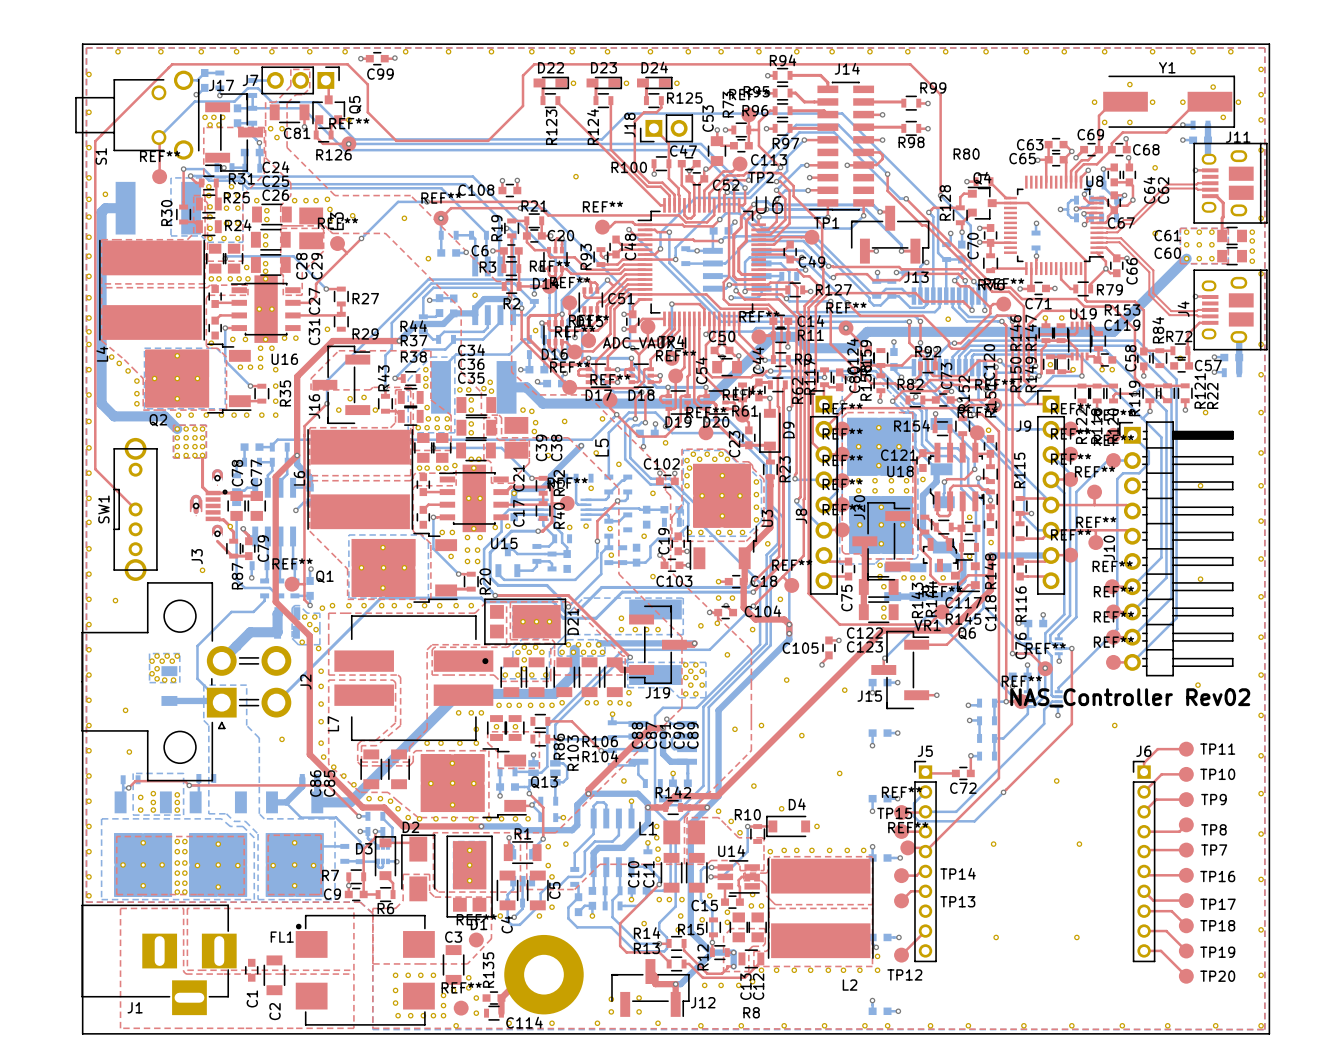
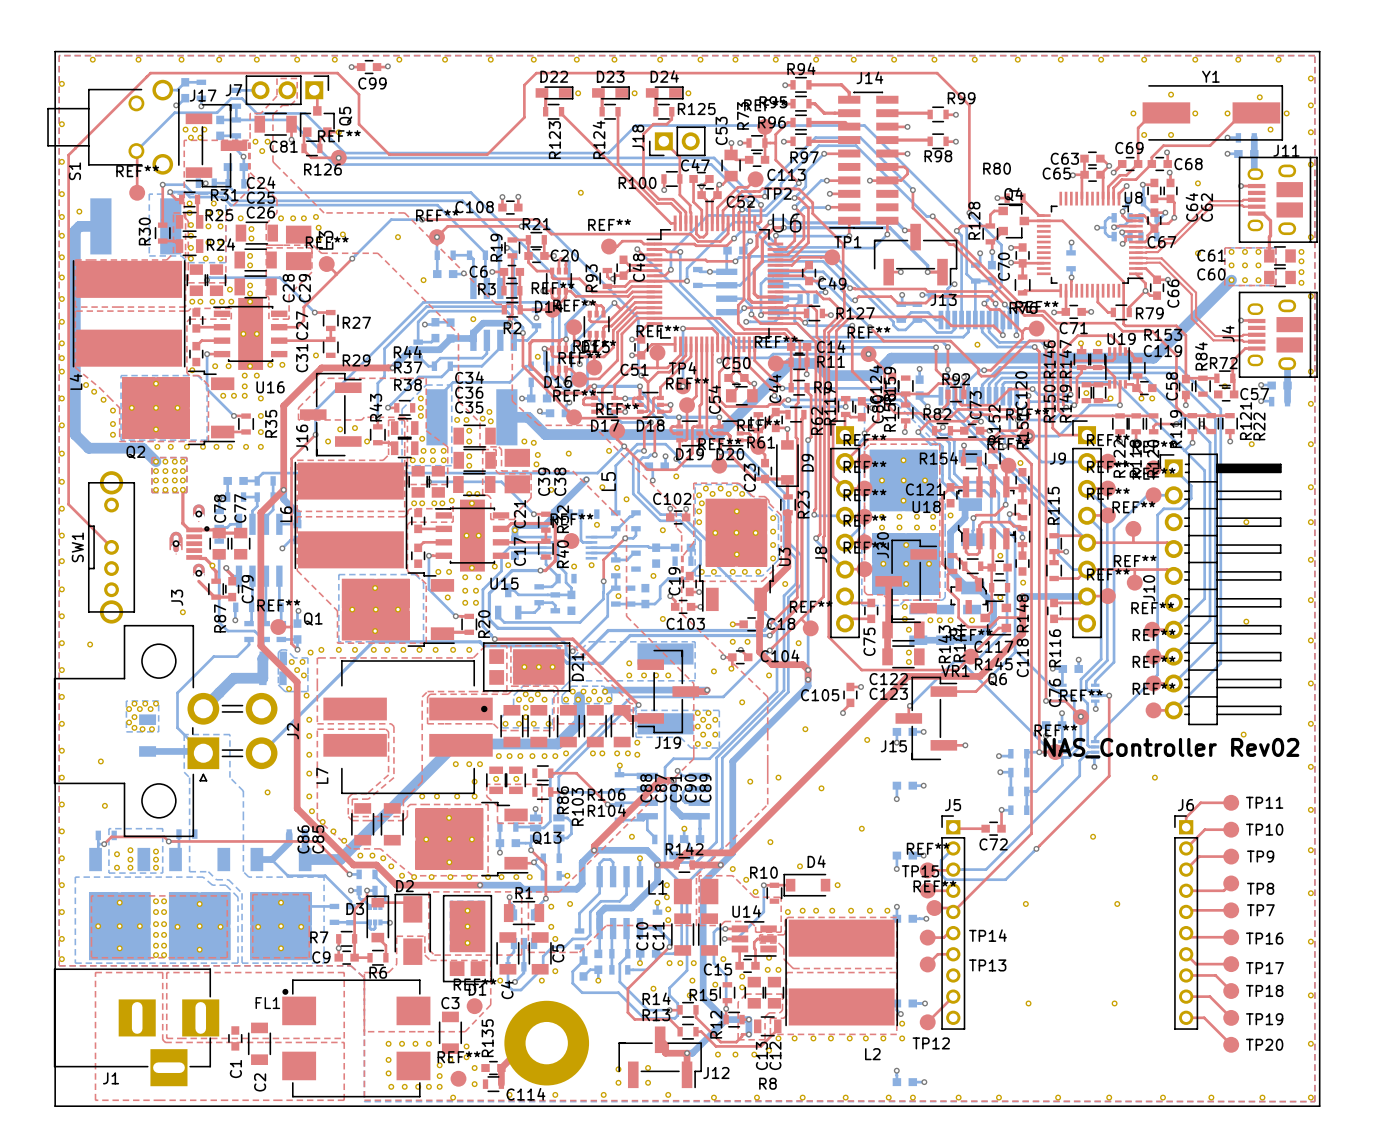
C51 name position: C51 (621, 298) -> C51 (634, 369)
ADC_VAUX_I name: ADC_VAUX_I (644, 343) -> REF** (657, 331)

